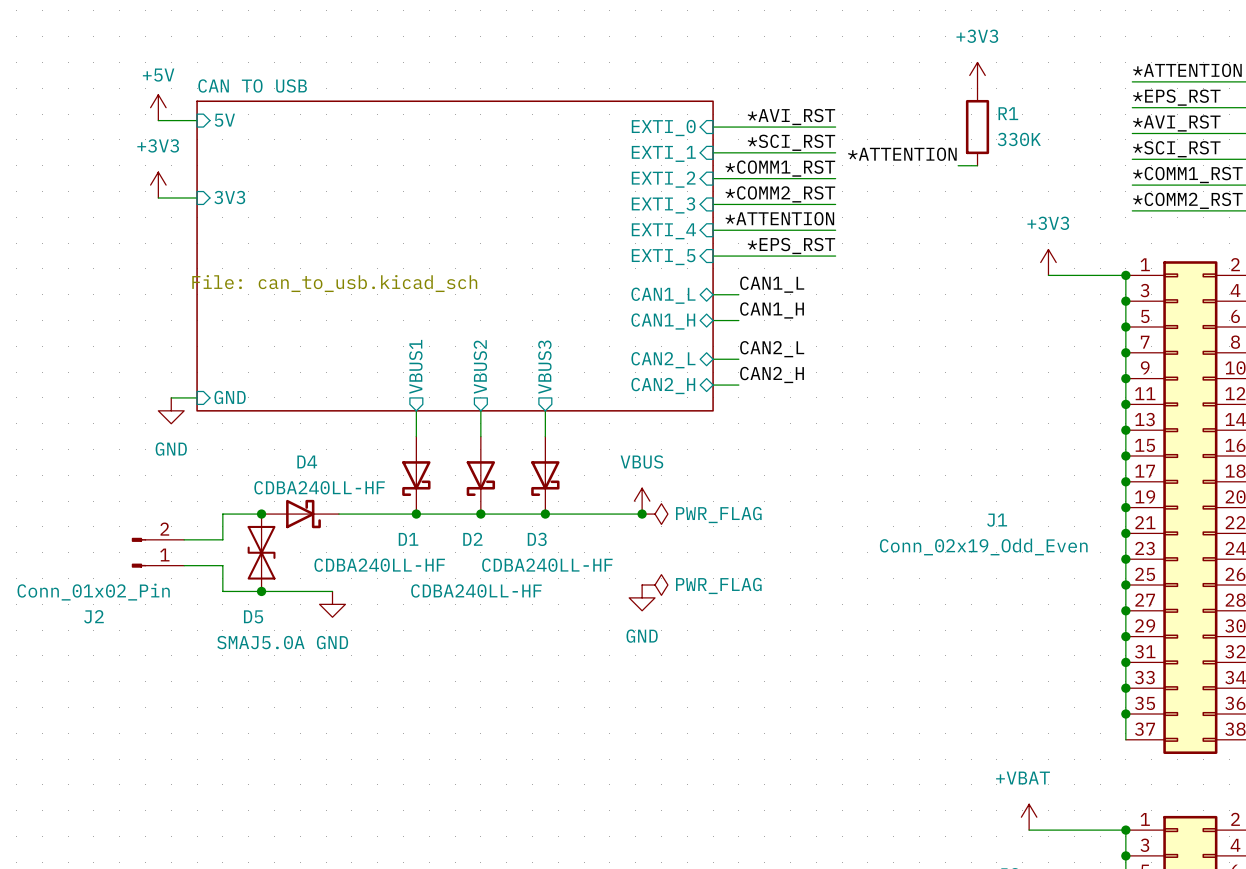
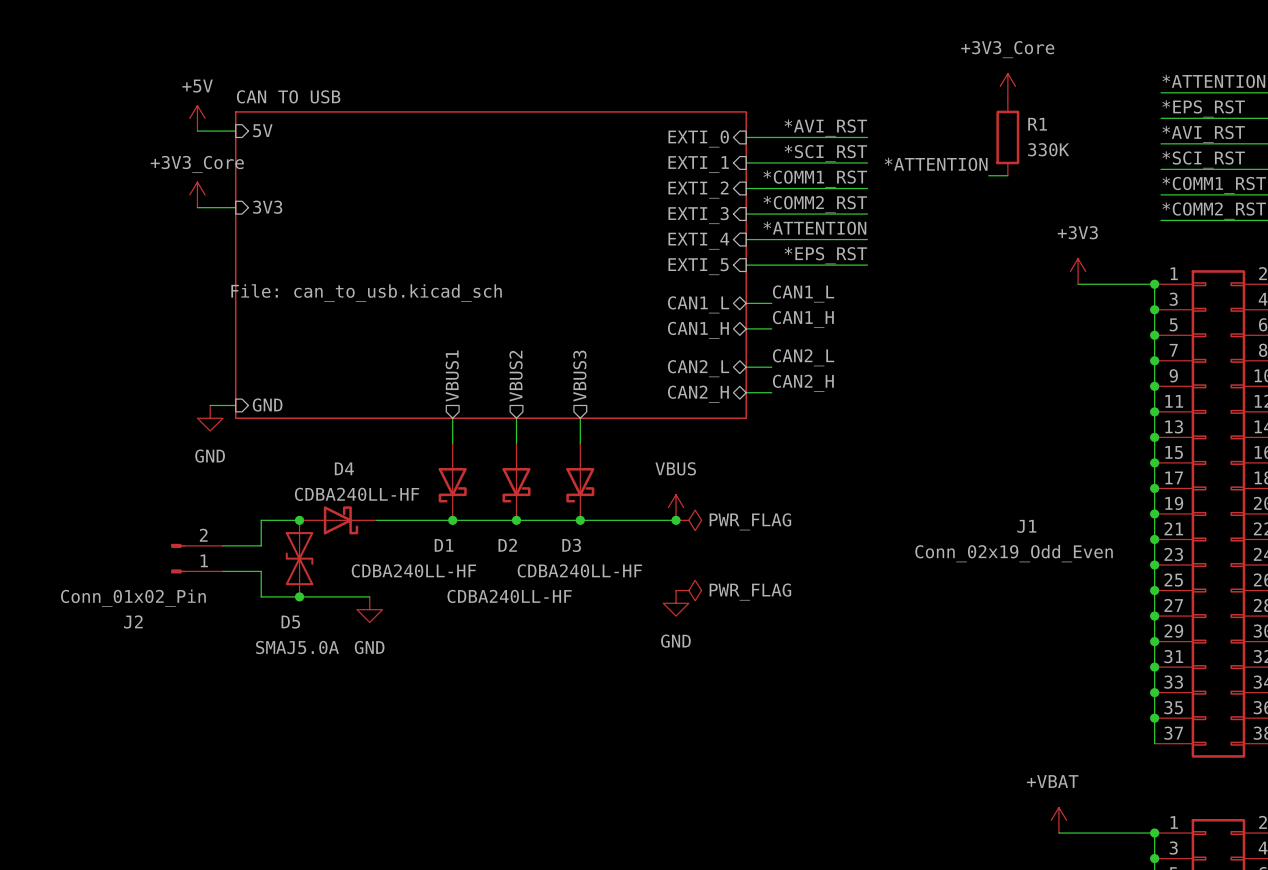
power symbol: +3V3 (977, 75) -> +3V3_Core (1007, 86)
power symbol: +3V3 (158, 185) -> +3V3_Core (197, 194)

